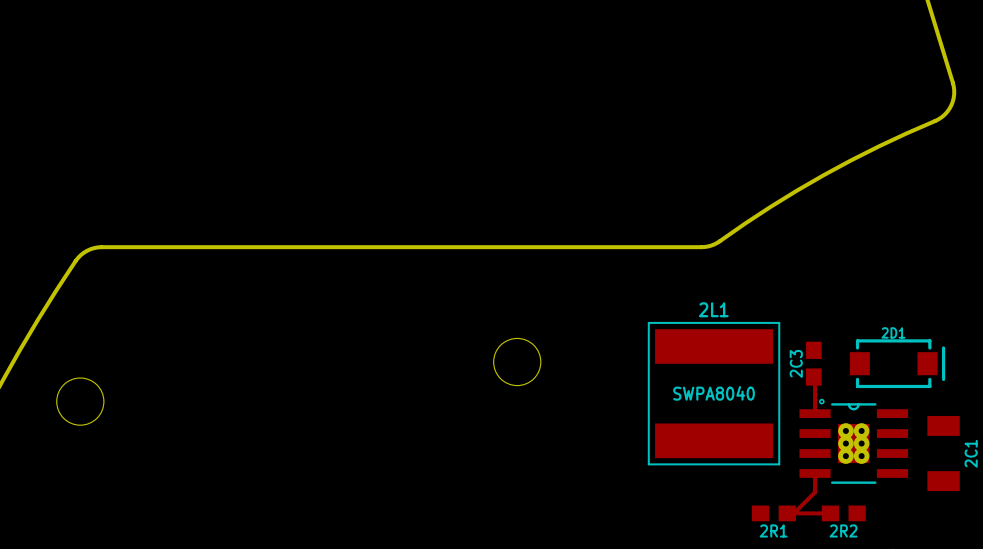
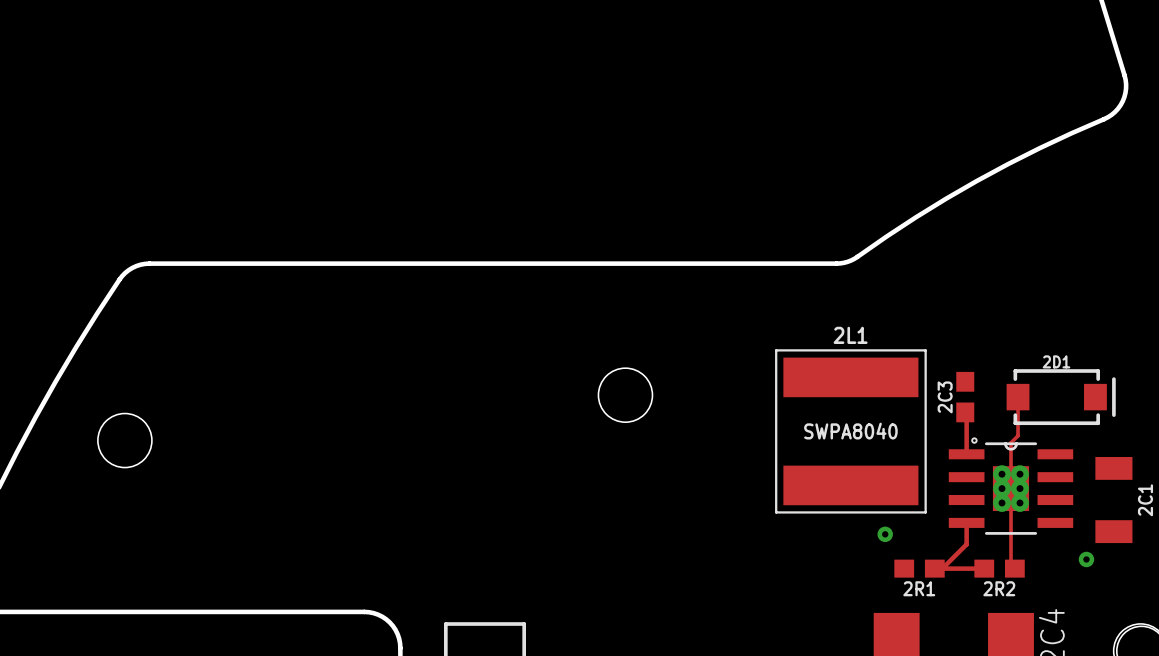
track: none -> (1018, 397) (1018, 435) (1011, 442) (1011, 564) (1014, 568)
via: none -> (885, 534)
via: none -> (1086, 559)

